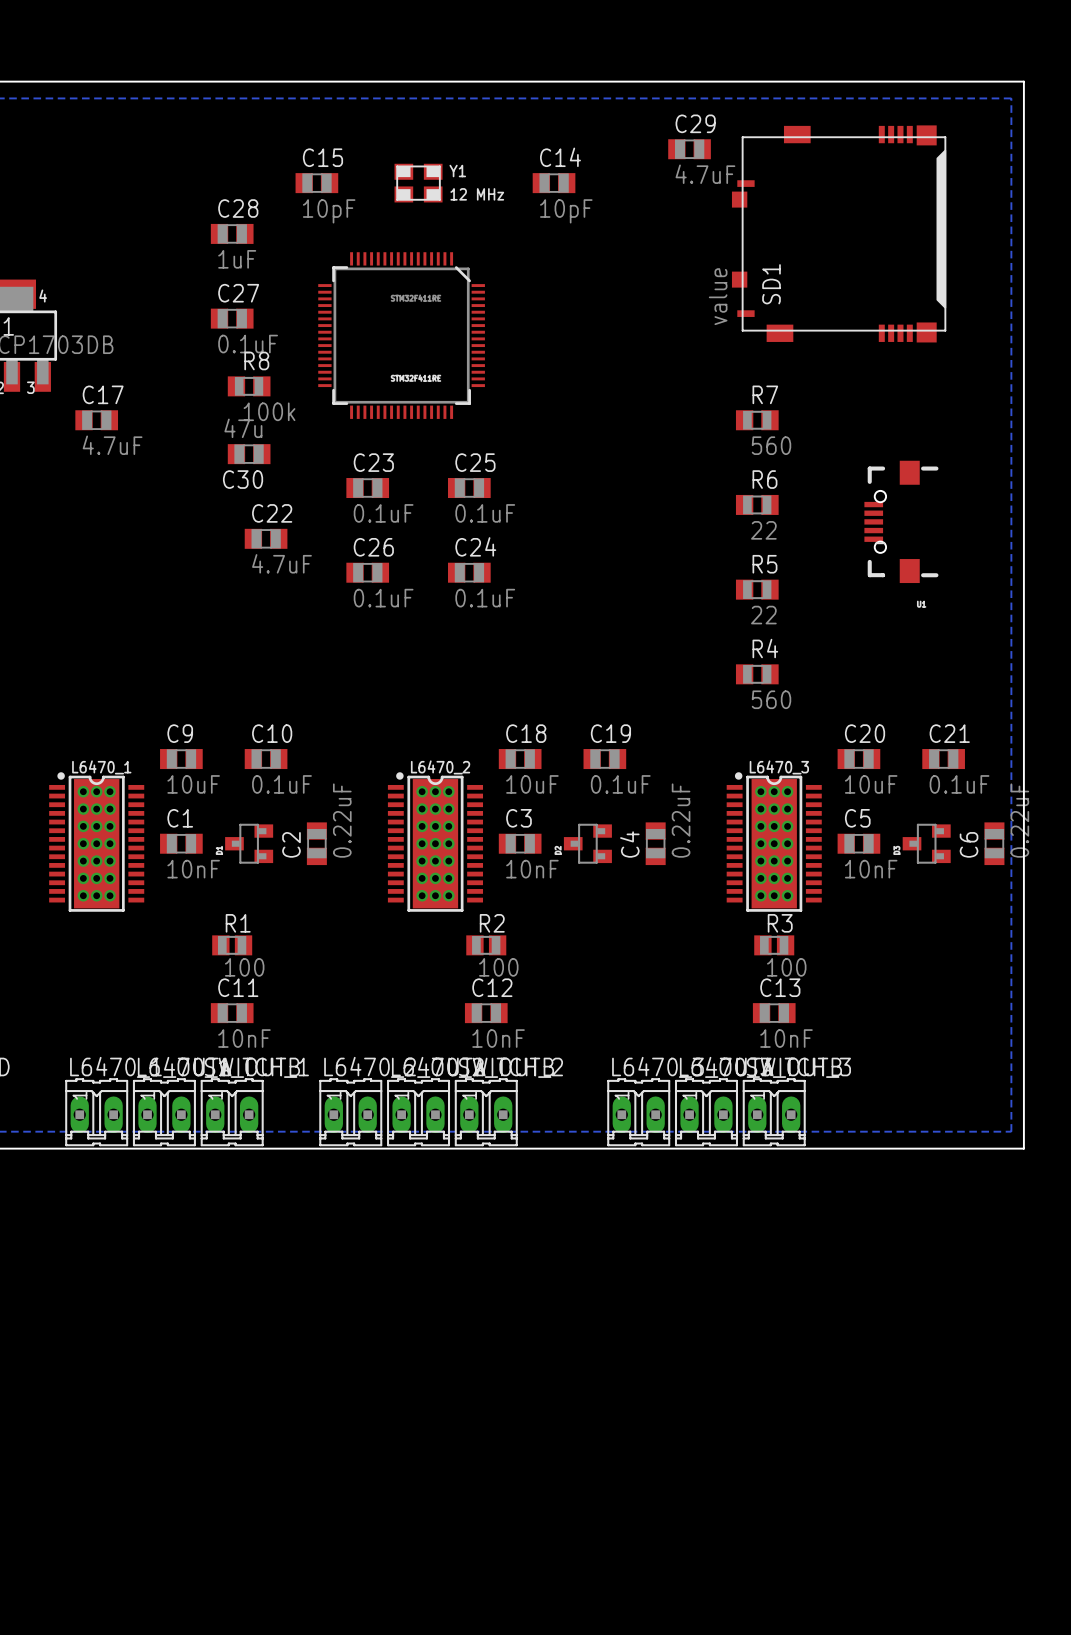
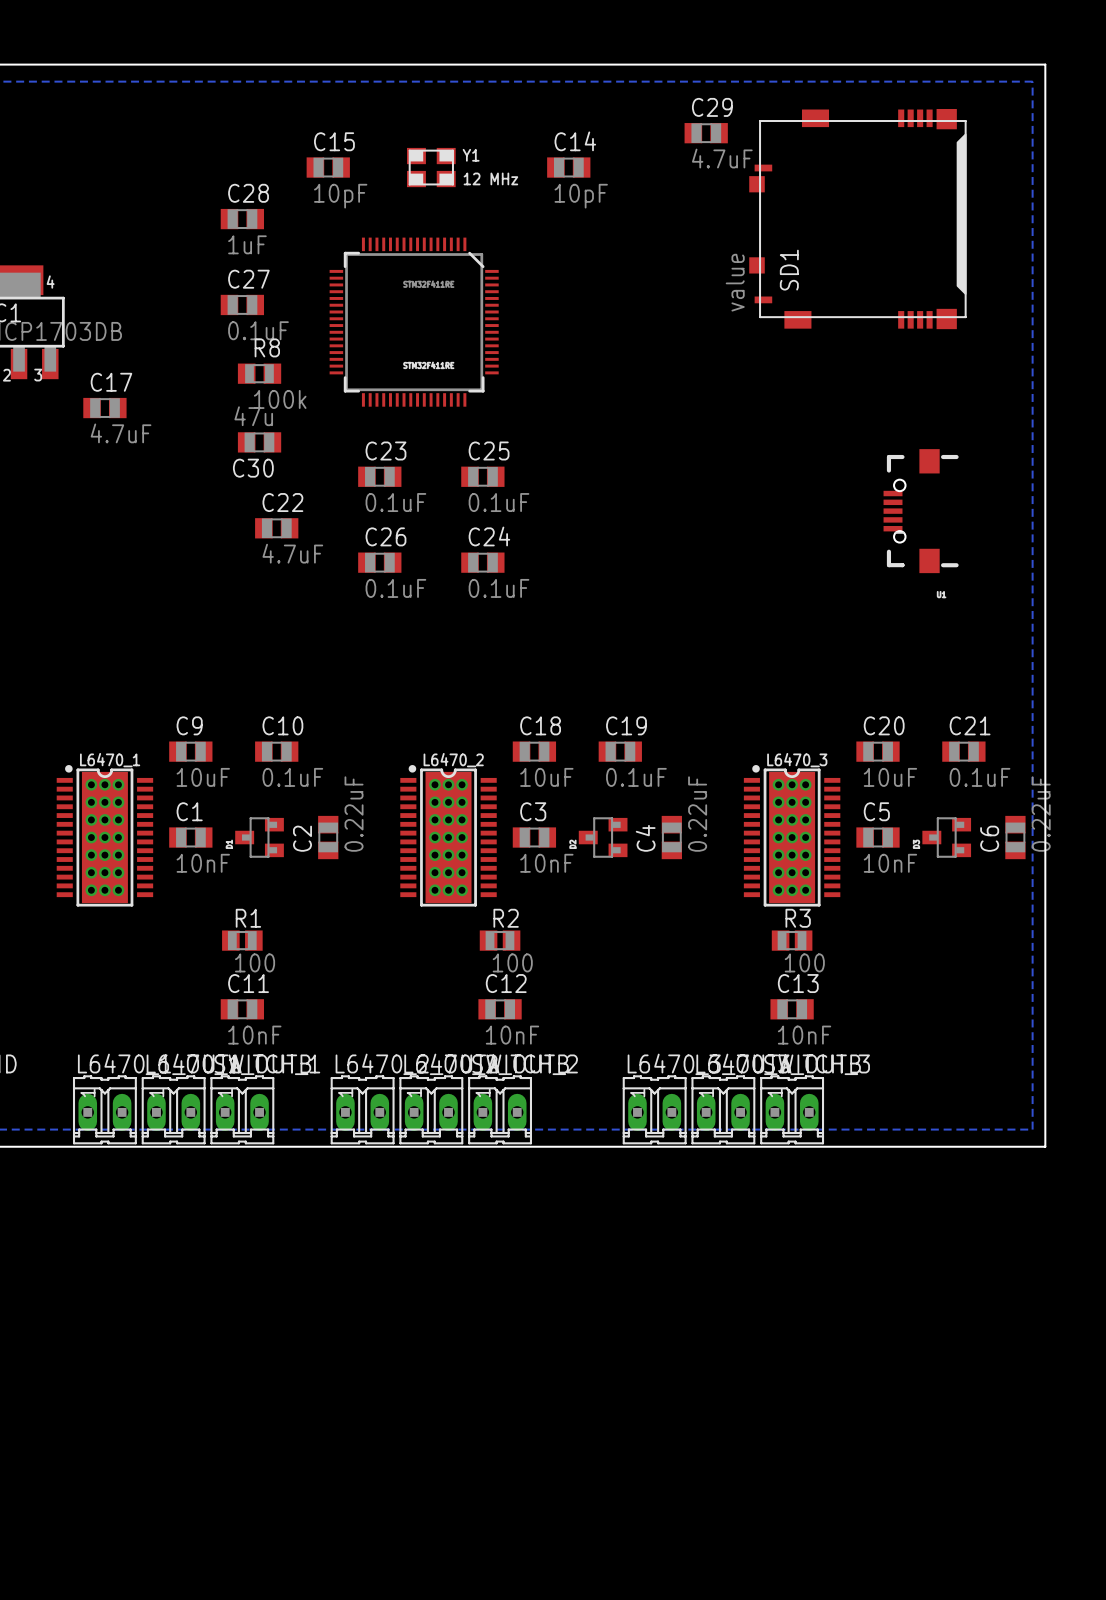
R7: 560 (757, 420) -> none
R6: 22 (757, 504) -> none
R5: 22 (757, 589) -> none
R4: 560 (757, 674) -> none

